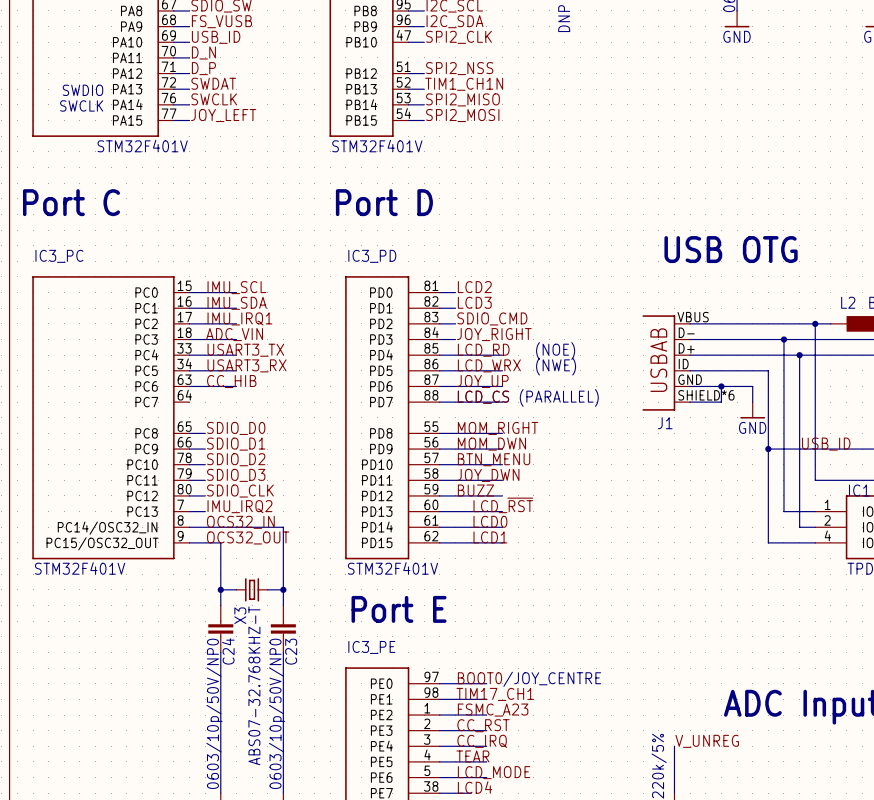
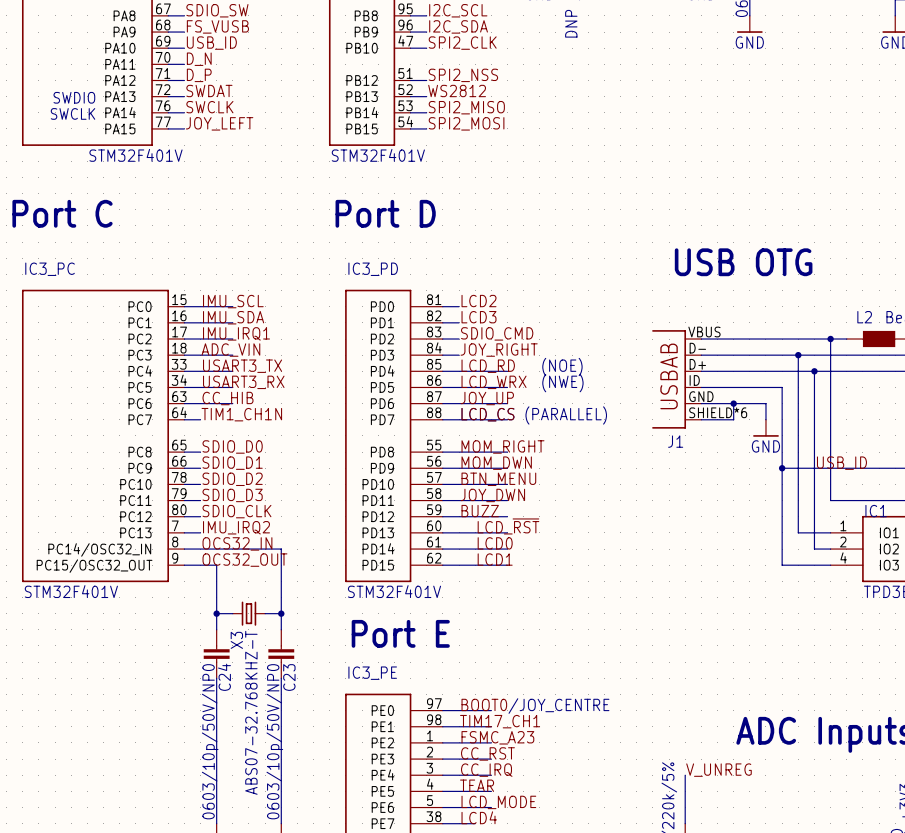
label: TIM1_CH1N (464, 84) -> WS2812 (457, 90)
label: none -> TIM1_CH1N (241, 414)
wire: none -> (184, 419) (200, 419)

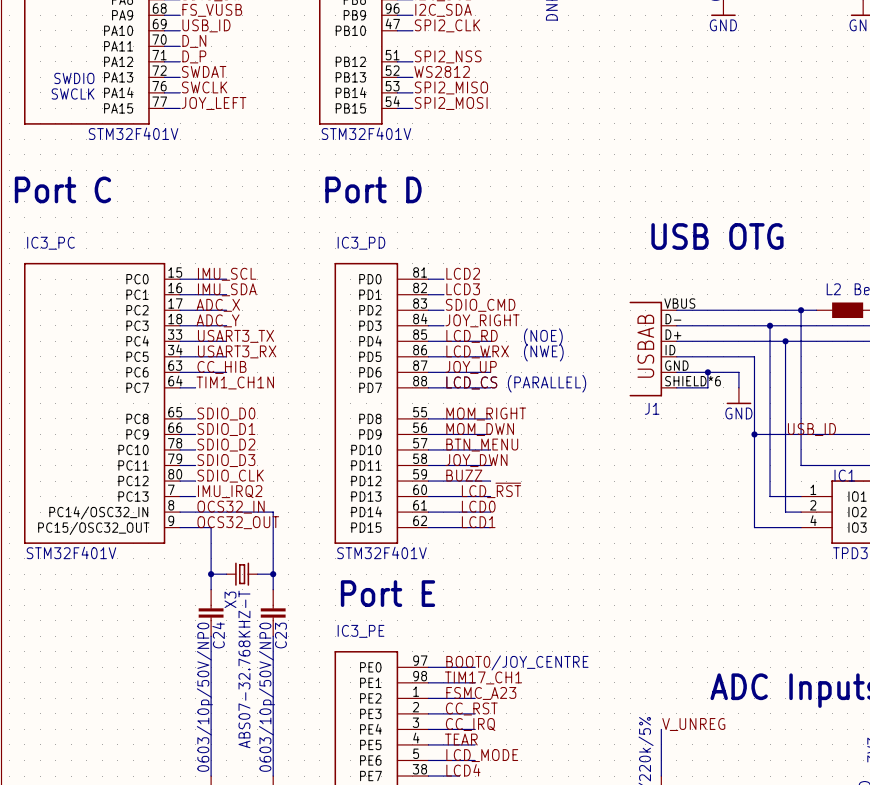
label: IMU_IRQ1 (236, 333) -> ADC_X (218, 305)
label: ADC_VIN (230, 350) -> ADC_Y (218, 320)

